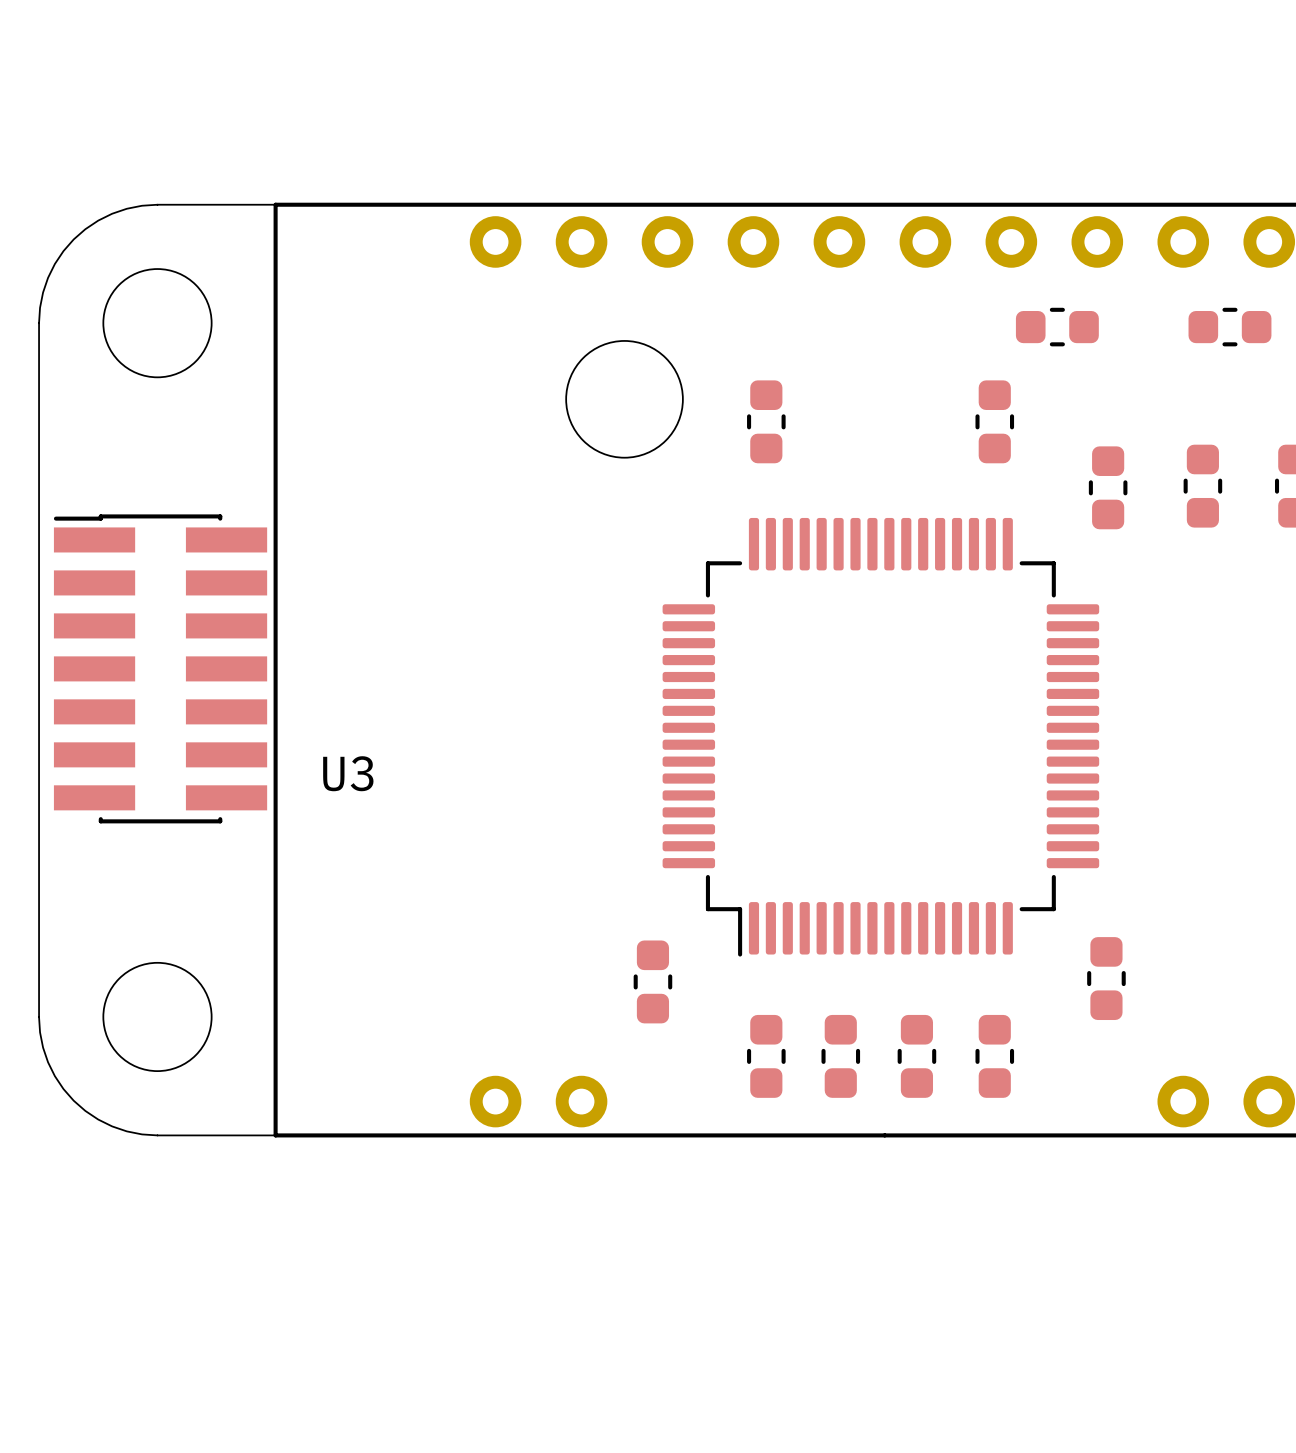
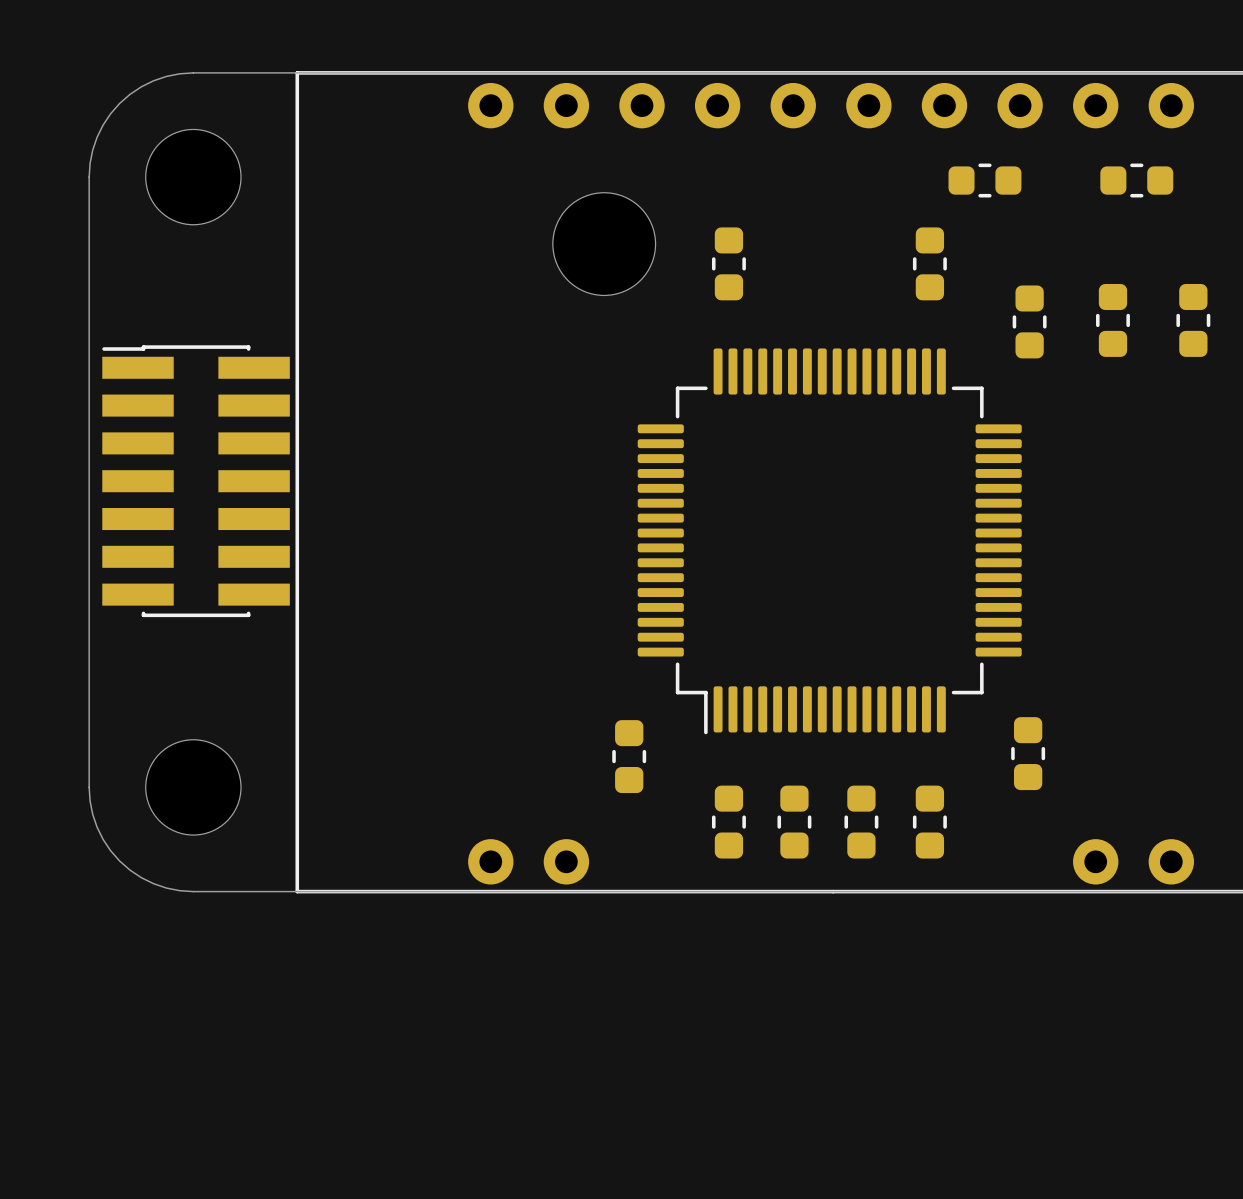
U3 name: U3 (348, 773) -> none

